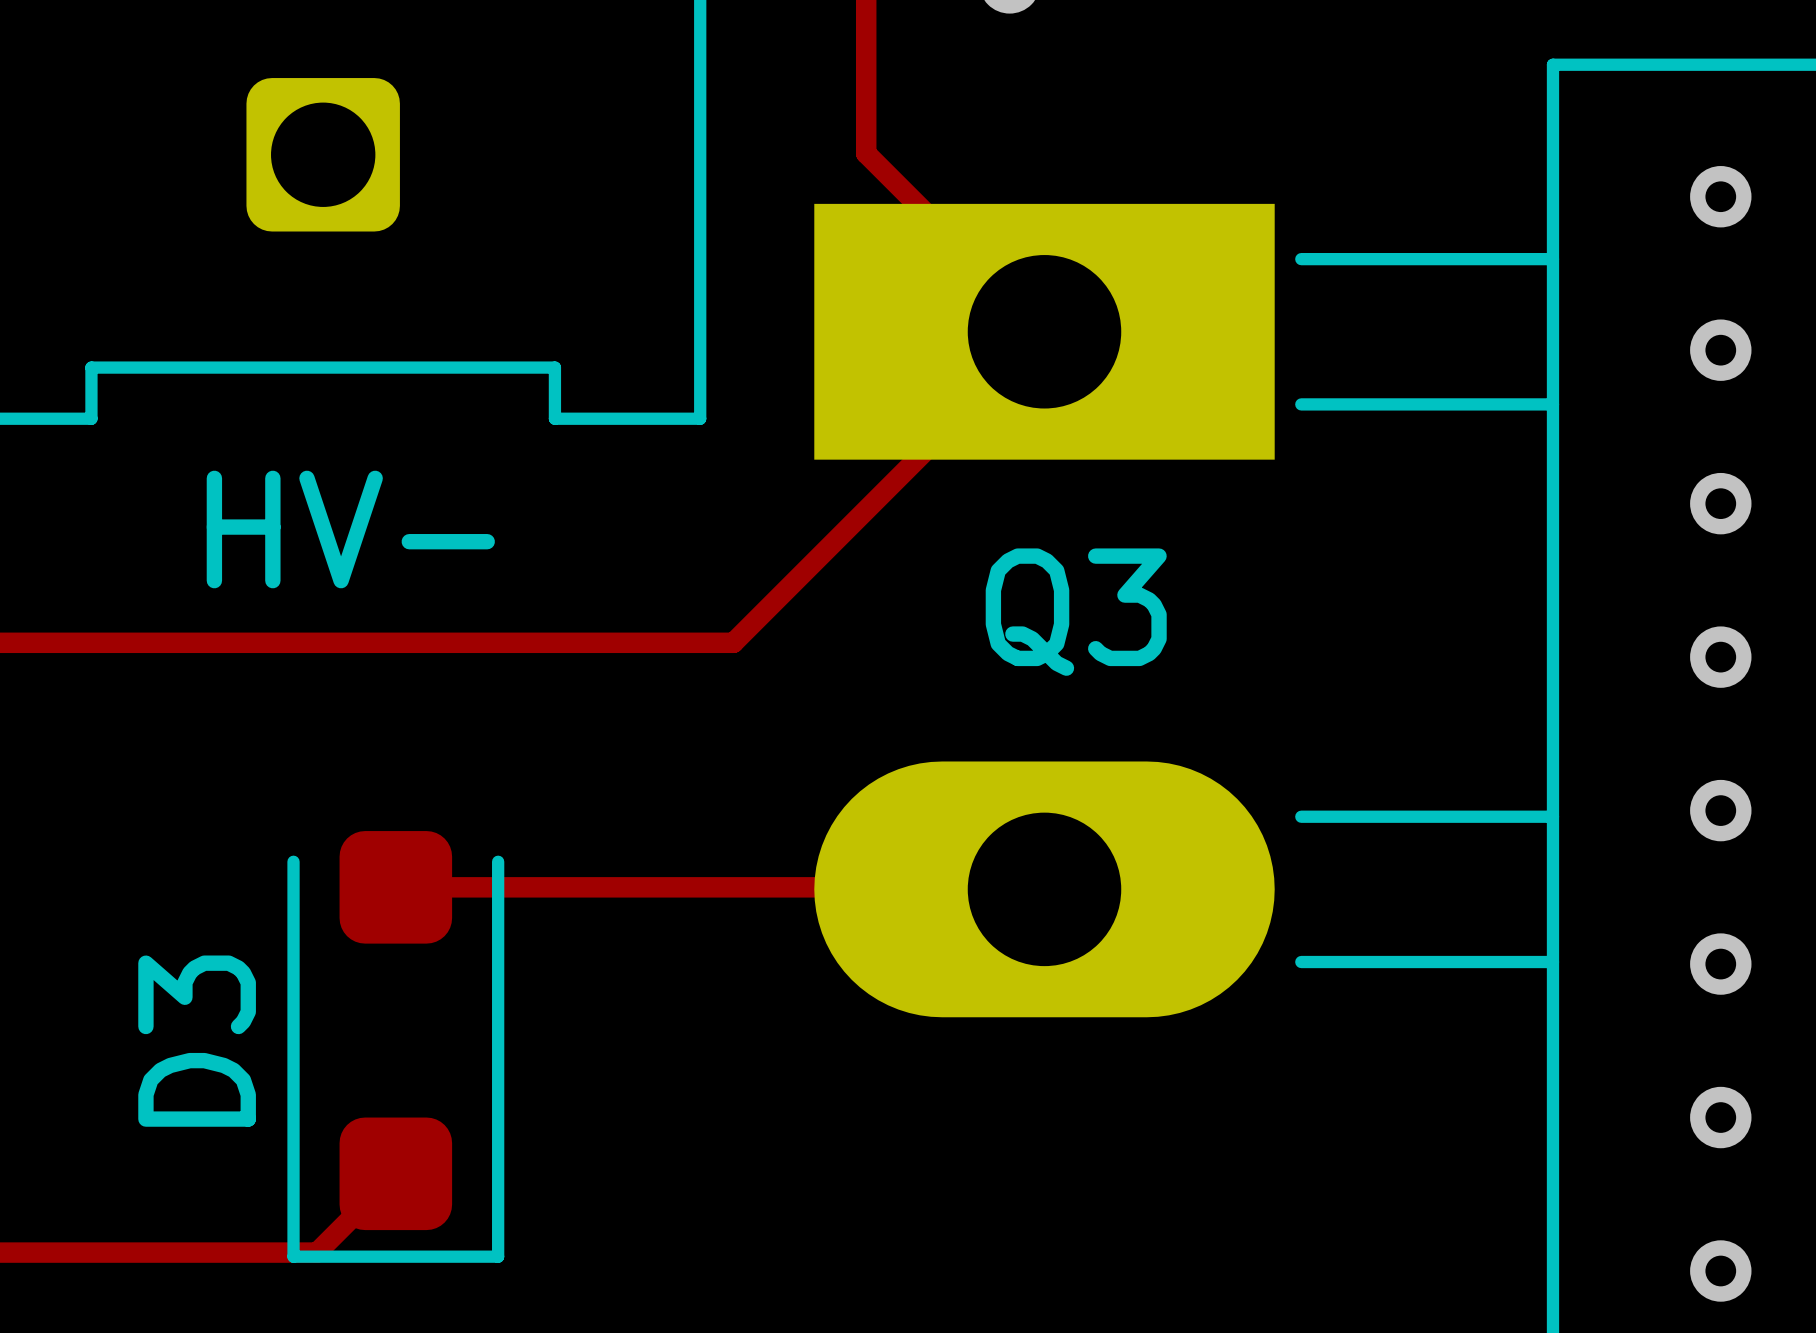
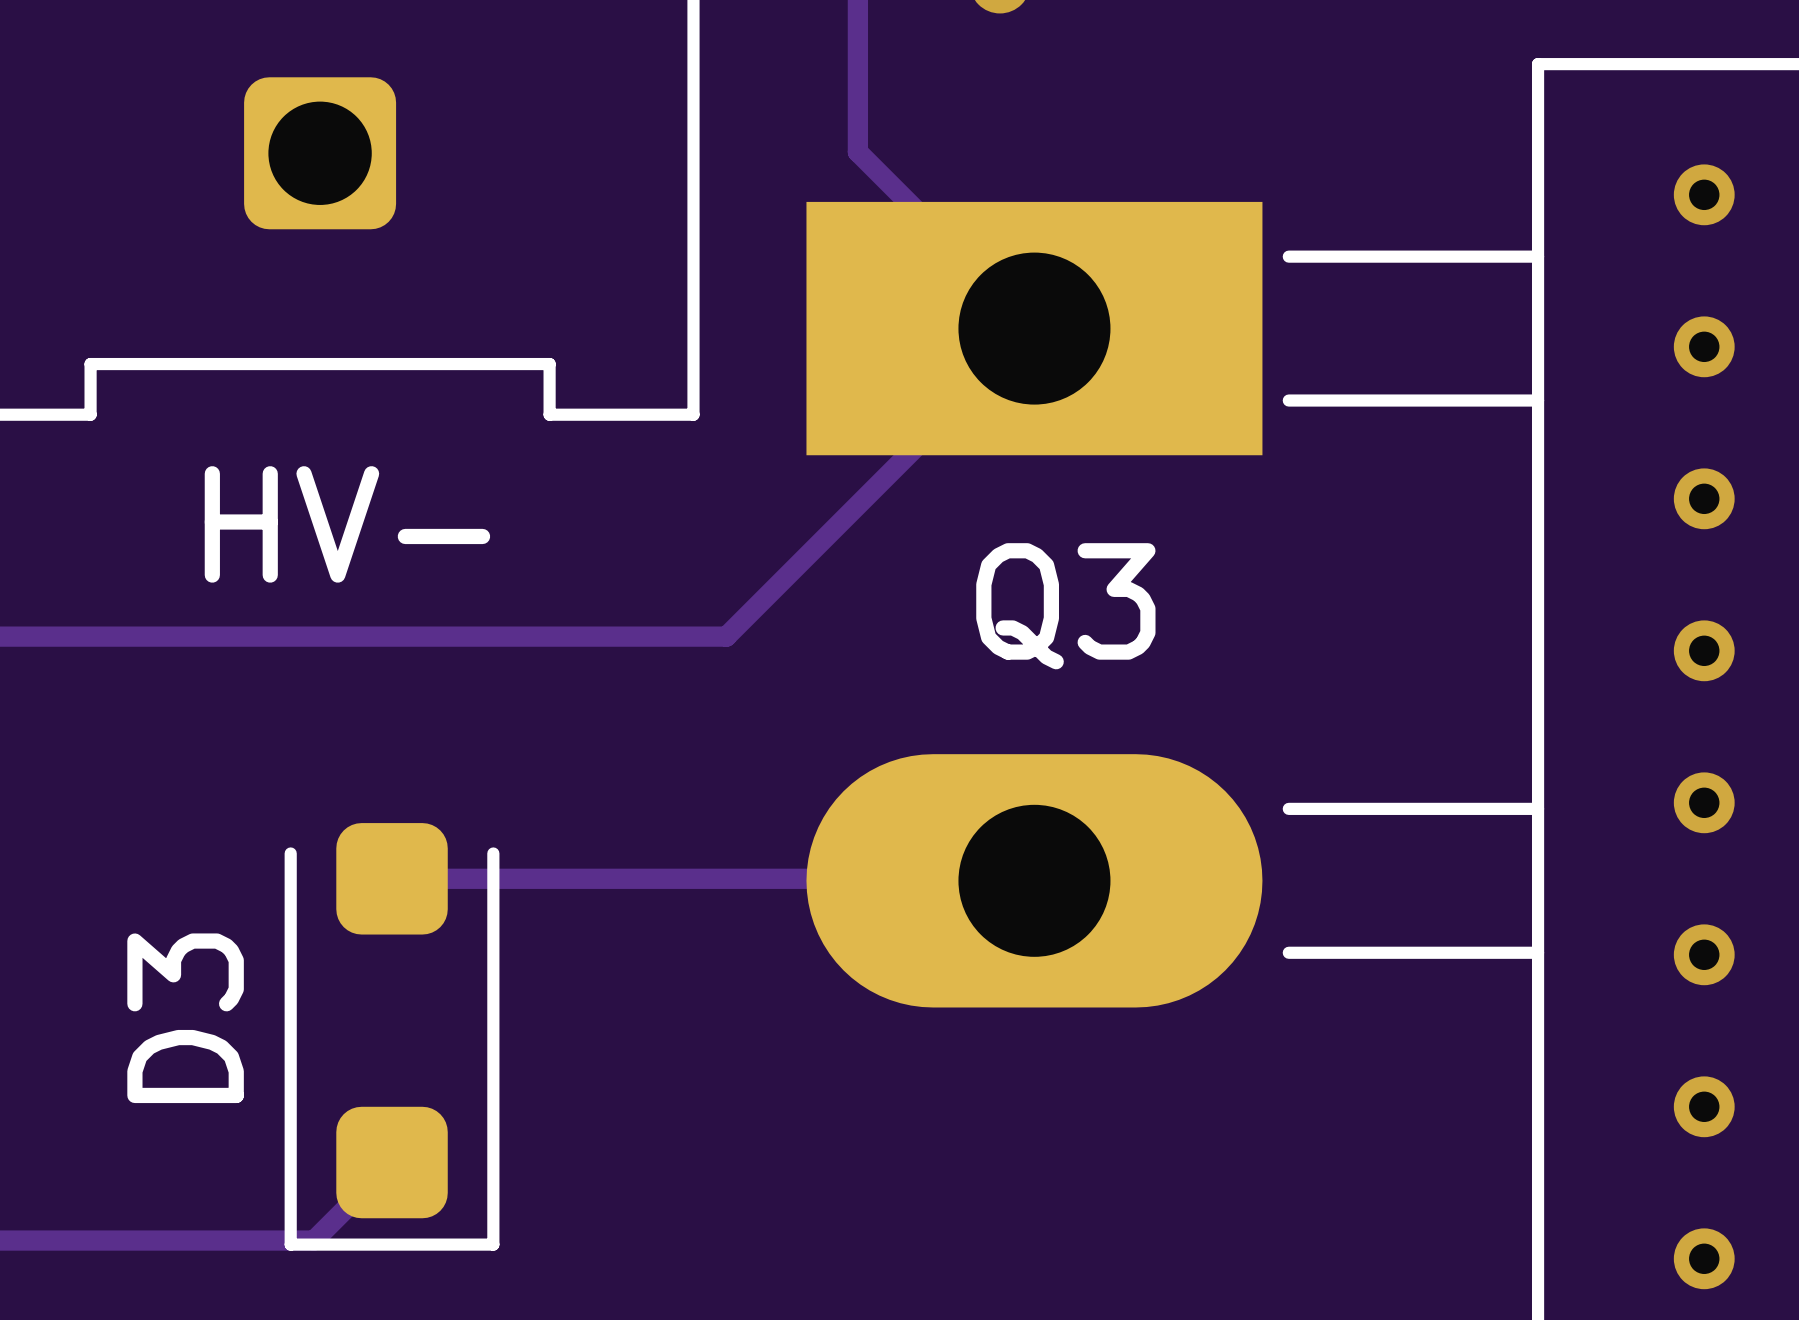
D3 name position: D3 (197, 1041) -> D3 (185, 1018)

